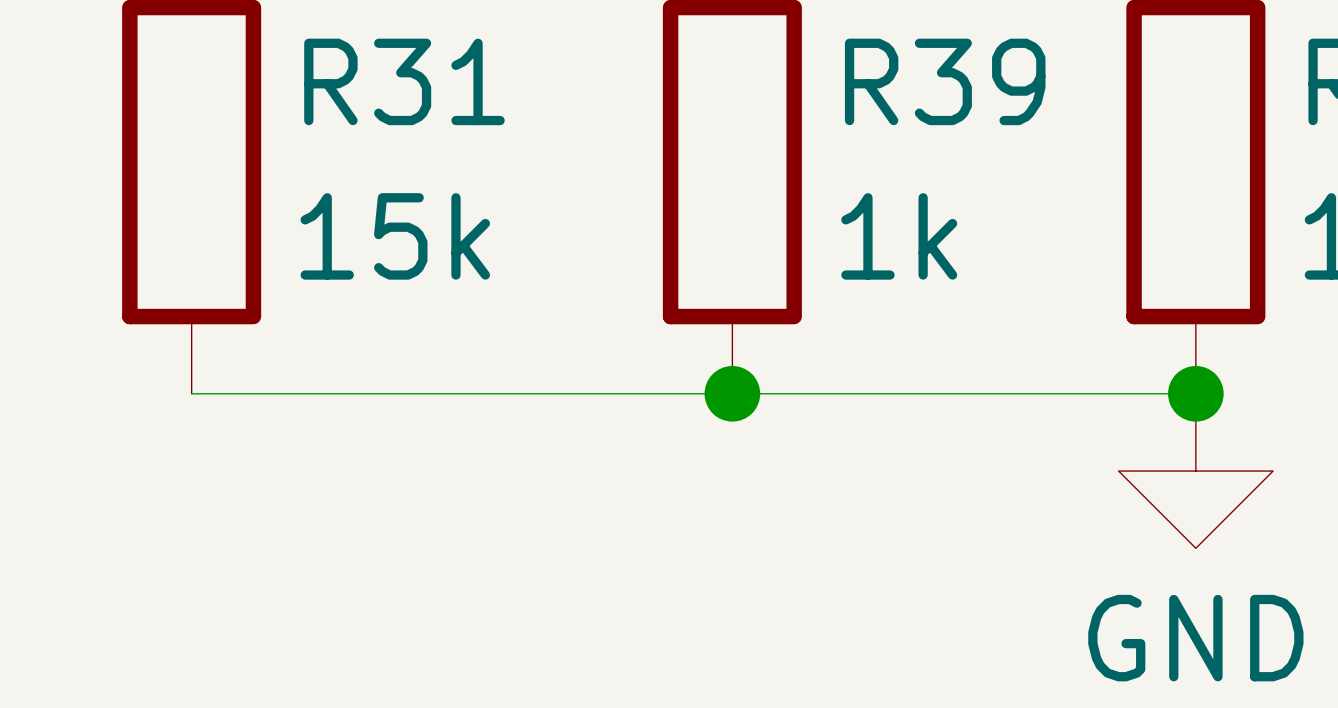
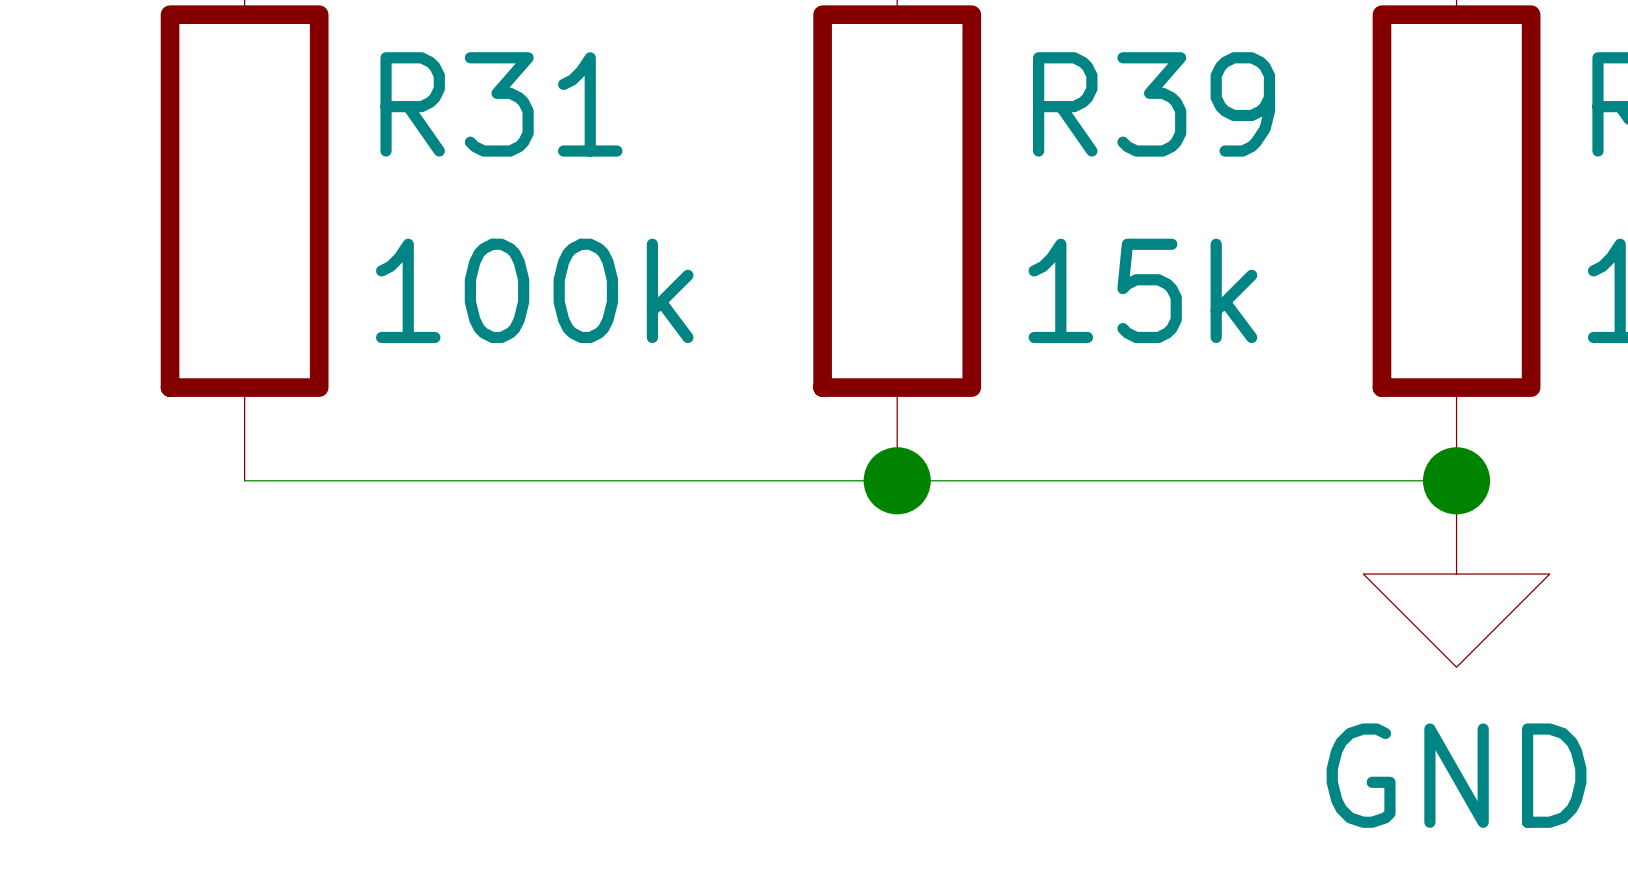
R31 value: 15k (395, 236) -> 100k (534, 290)
R39 value: 1k (899, 236) -> 15k (1142, 290)

